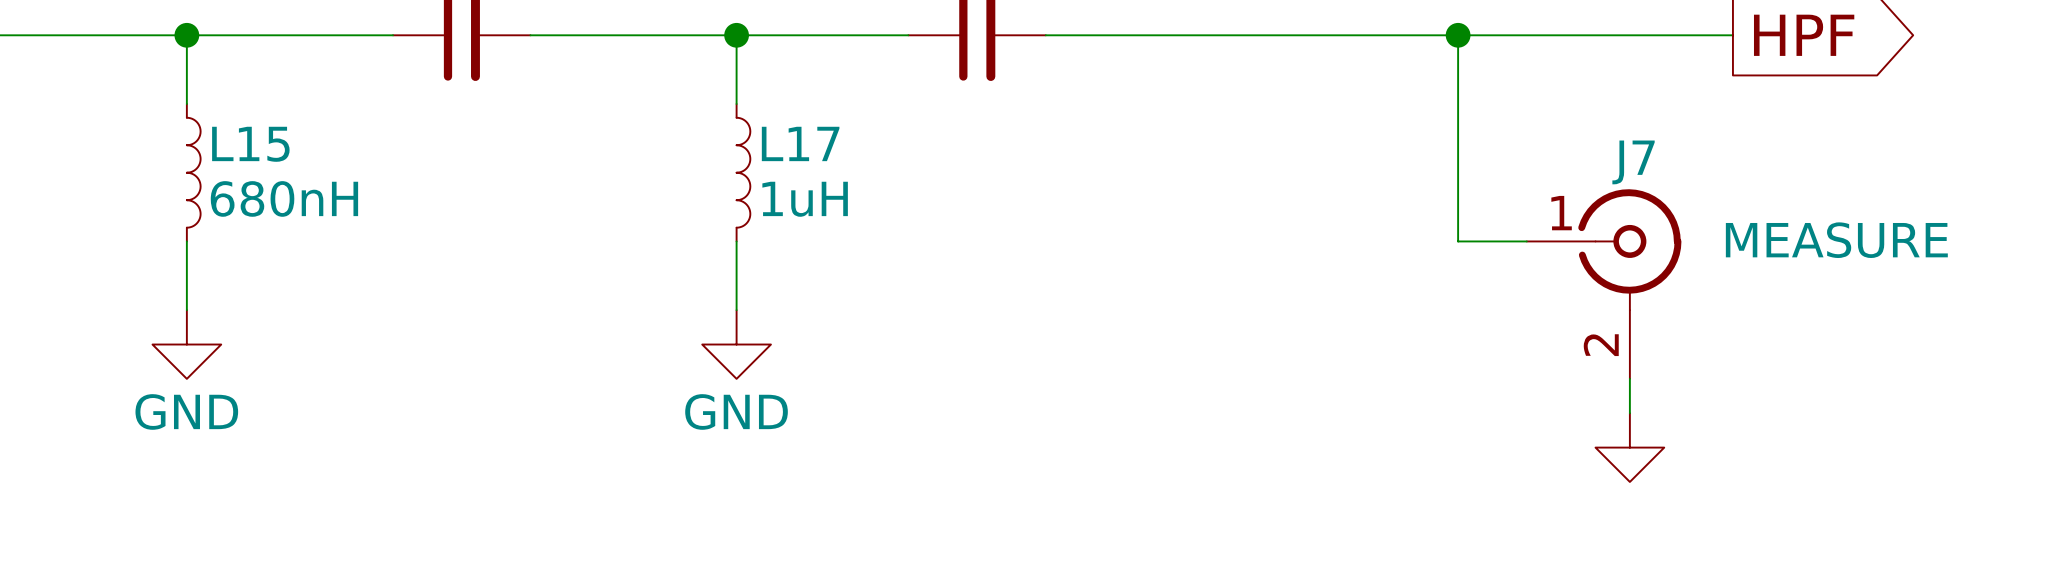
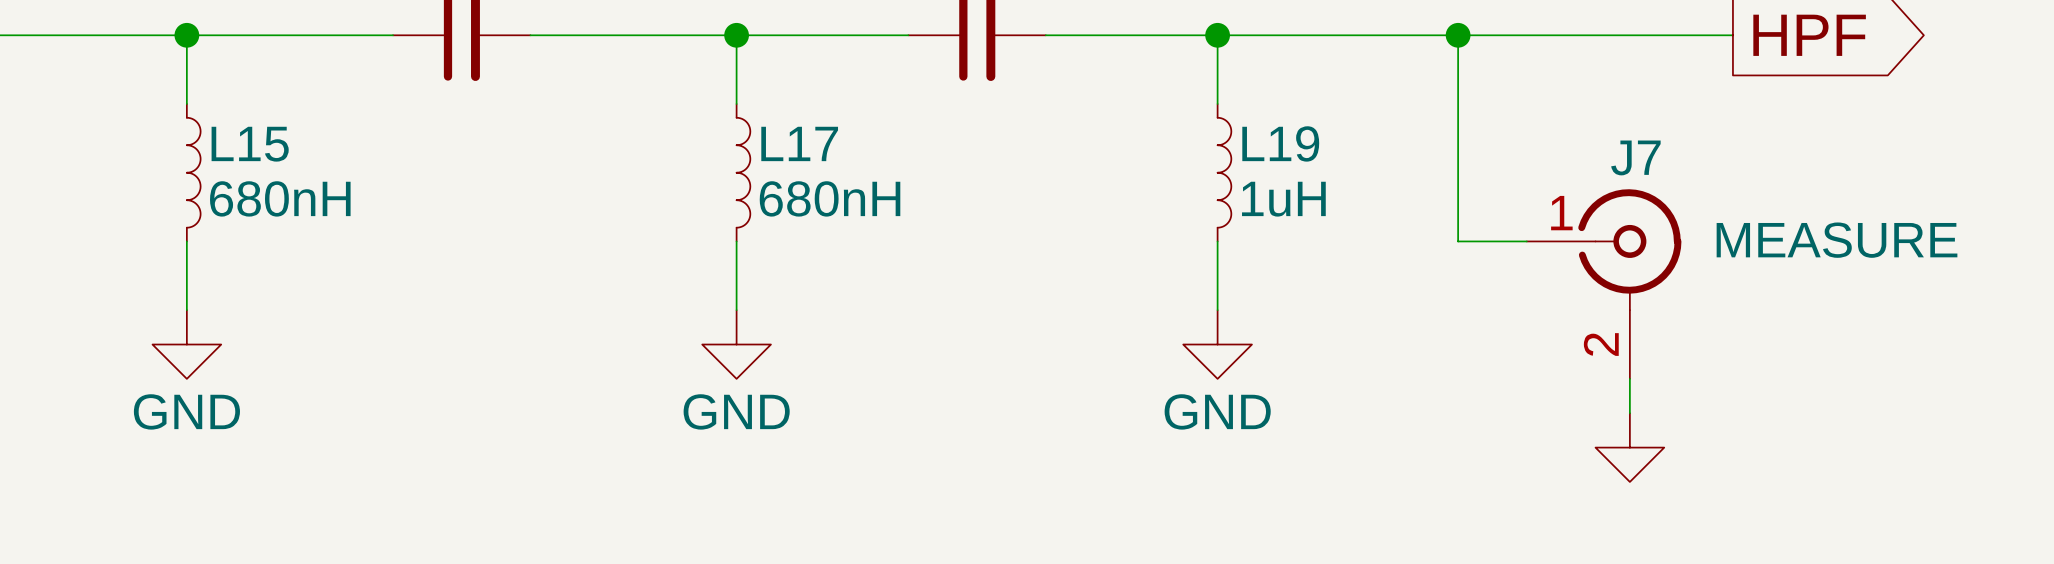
wire: none -> (1217, 35) (1217, 104)
junction: none -> (1217, 35)
L19: none -> 1uH (1224, 172)
L17 value: 1uH (805, 199) -> 680nH (830, 198)
wire: none -> (1217, 241) (1217, 310)
power symbol: none -> GND (1217, 344)

